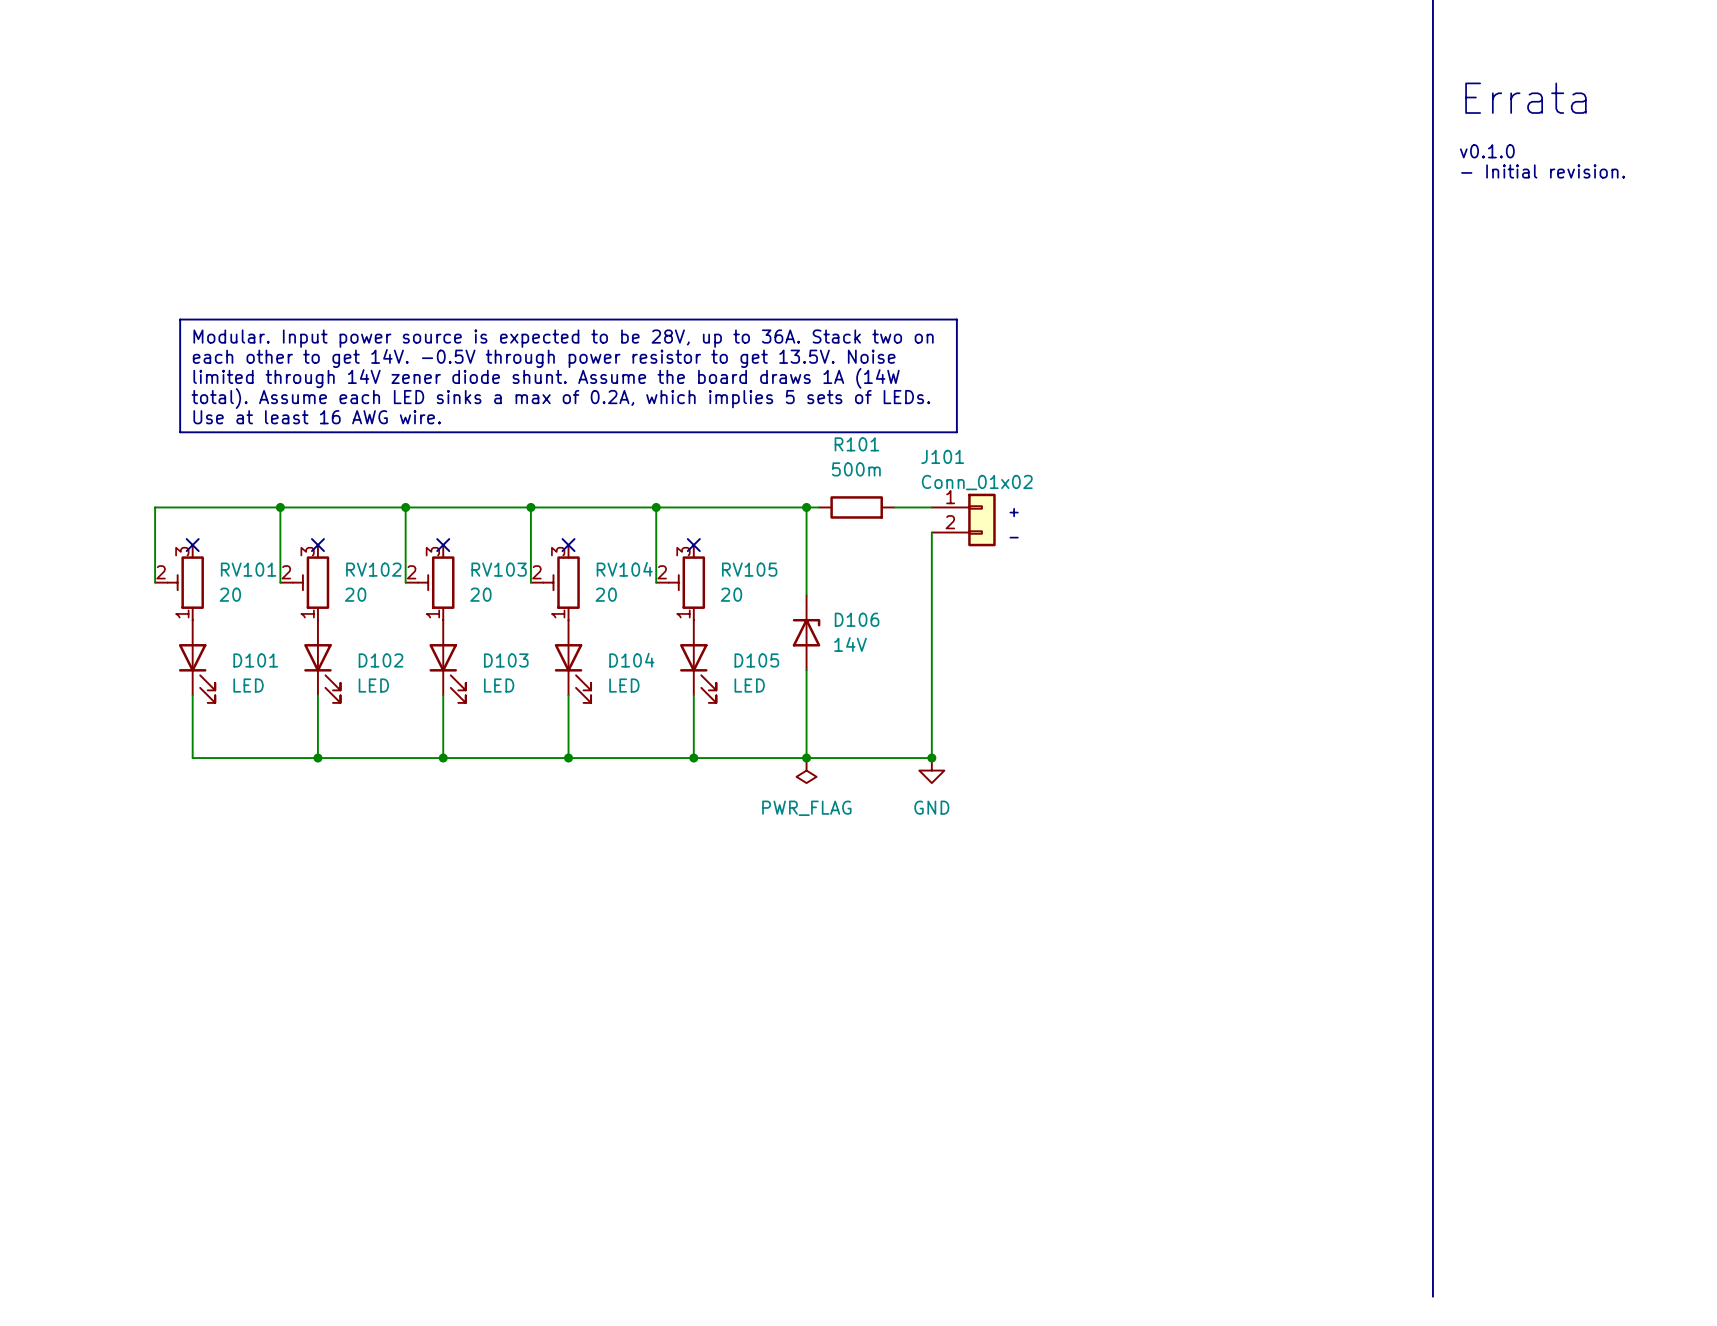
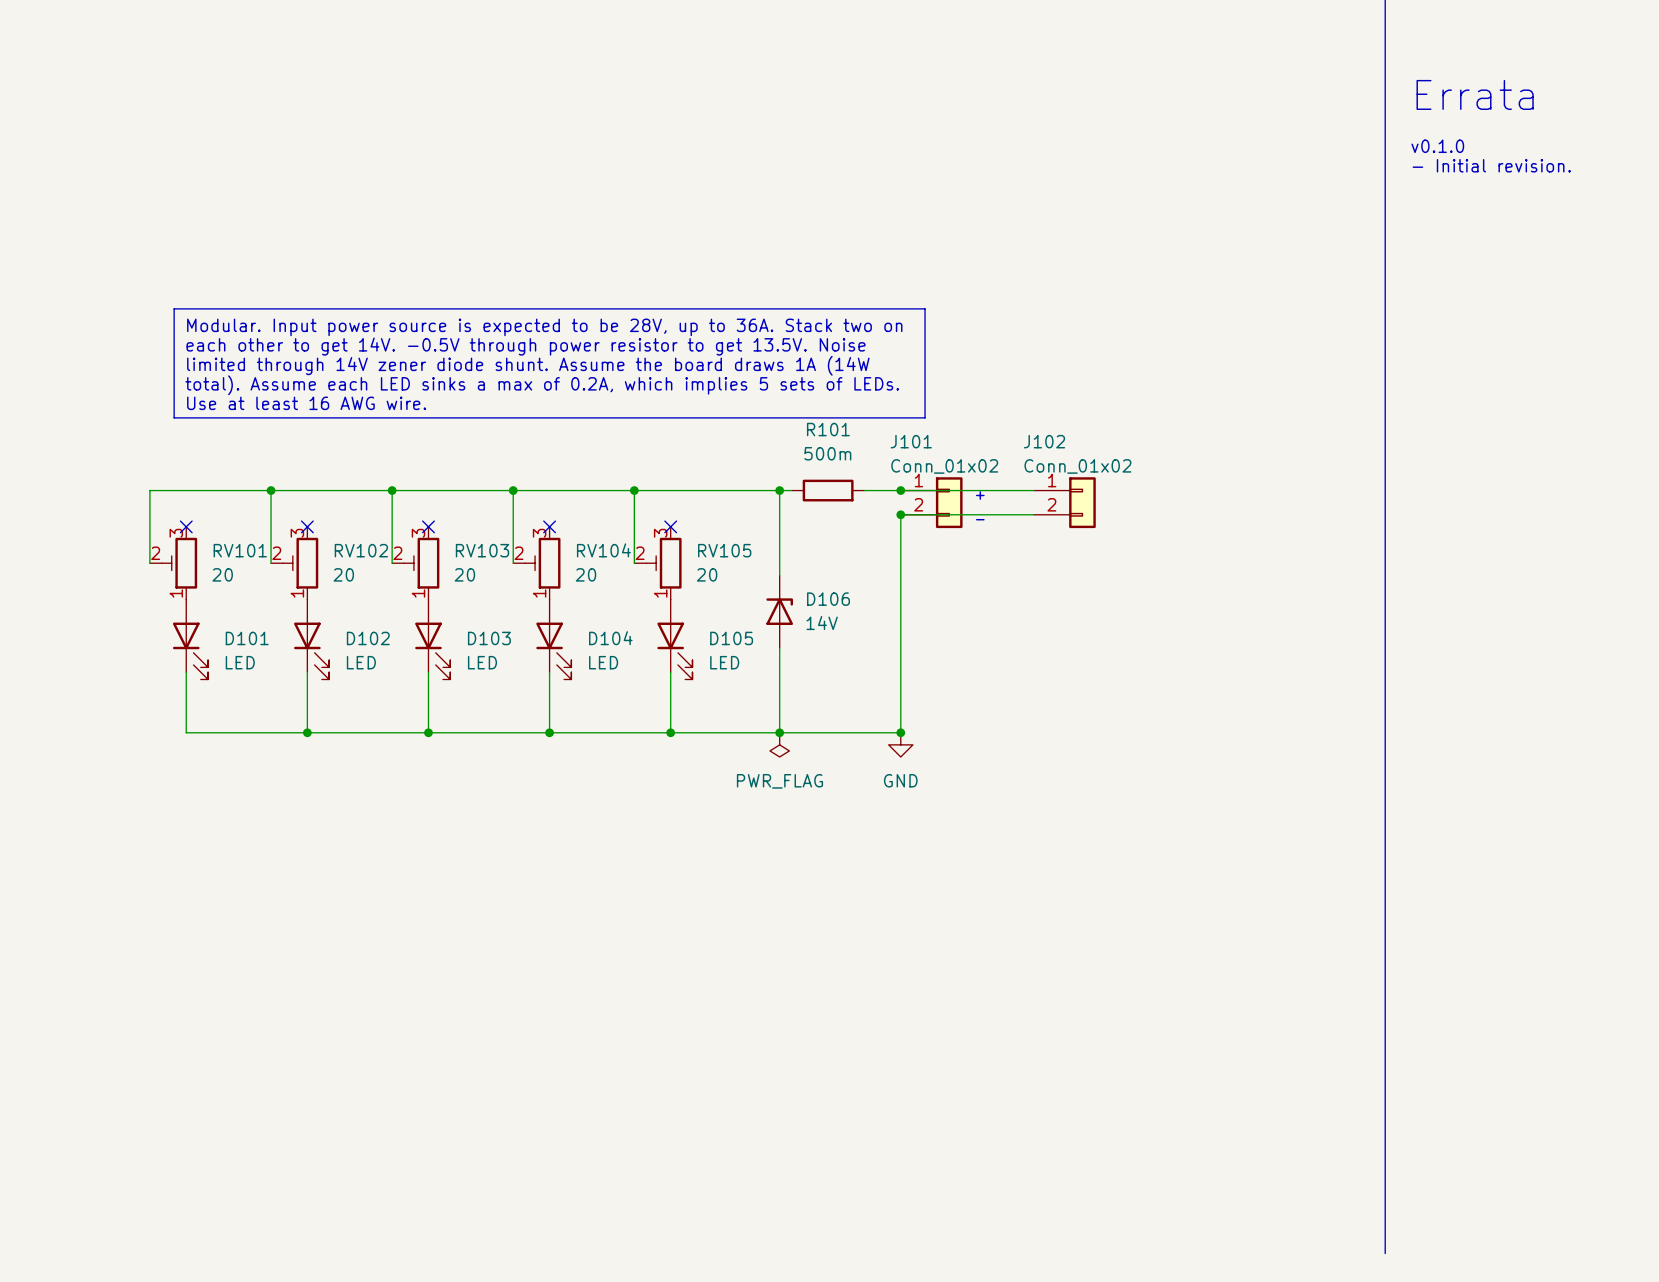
wire: none -> (900, 490) (1034, 490)
junction: none -> (900, 490)
J102: none -> Conn_01x02 (1064, 502)
wire: none -> (900, 514) (1034, 514)
junction: none -> (900, 514)

